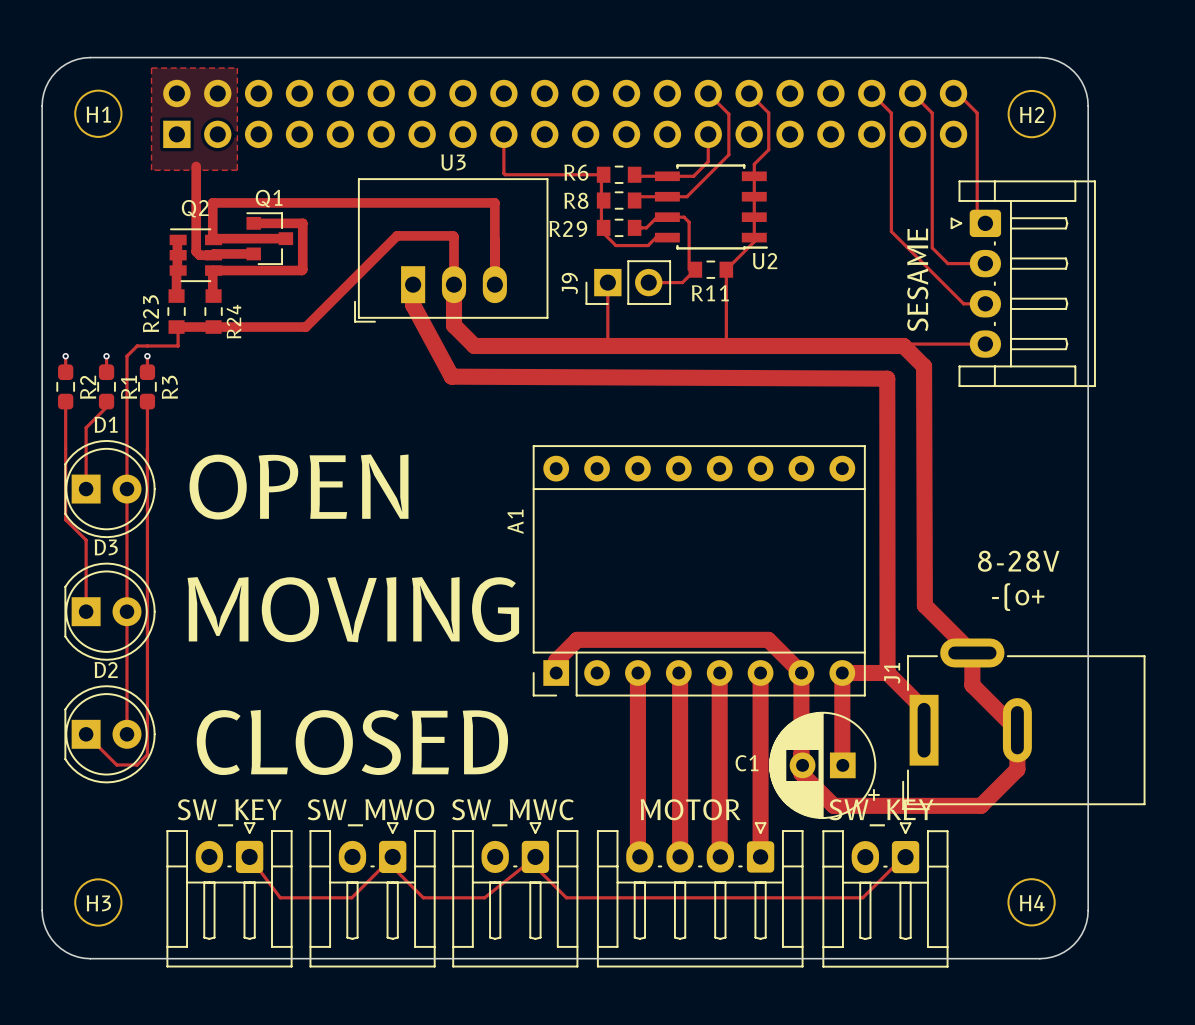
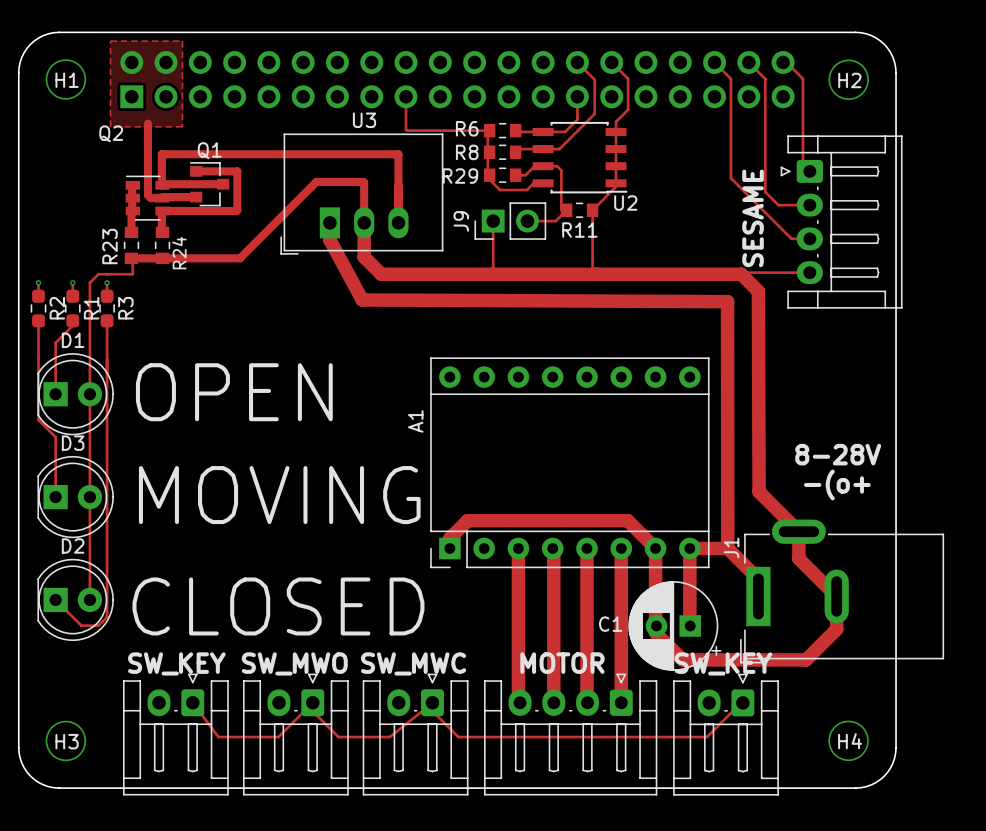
Q2 name position: Q2 (195, 208) -> Q2 (111, 133)

